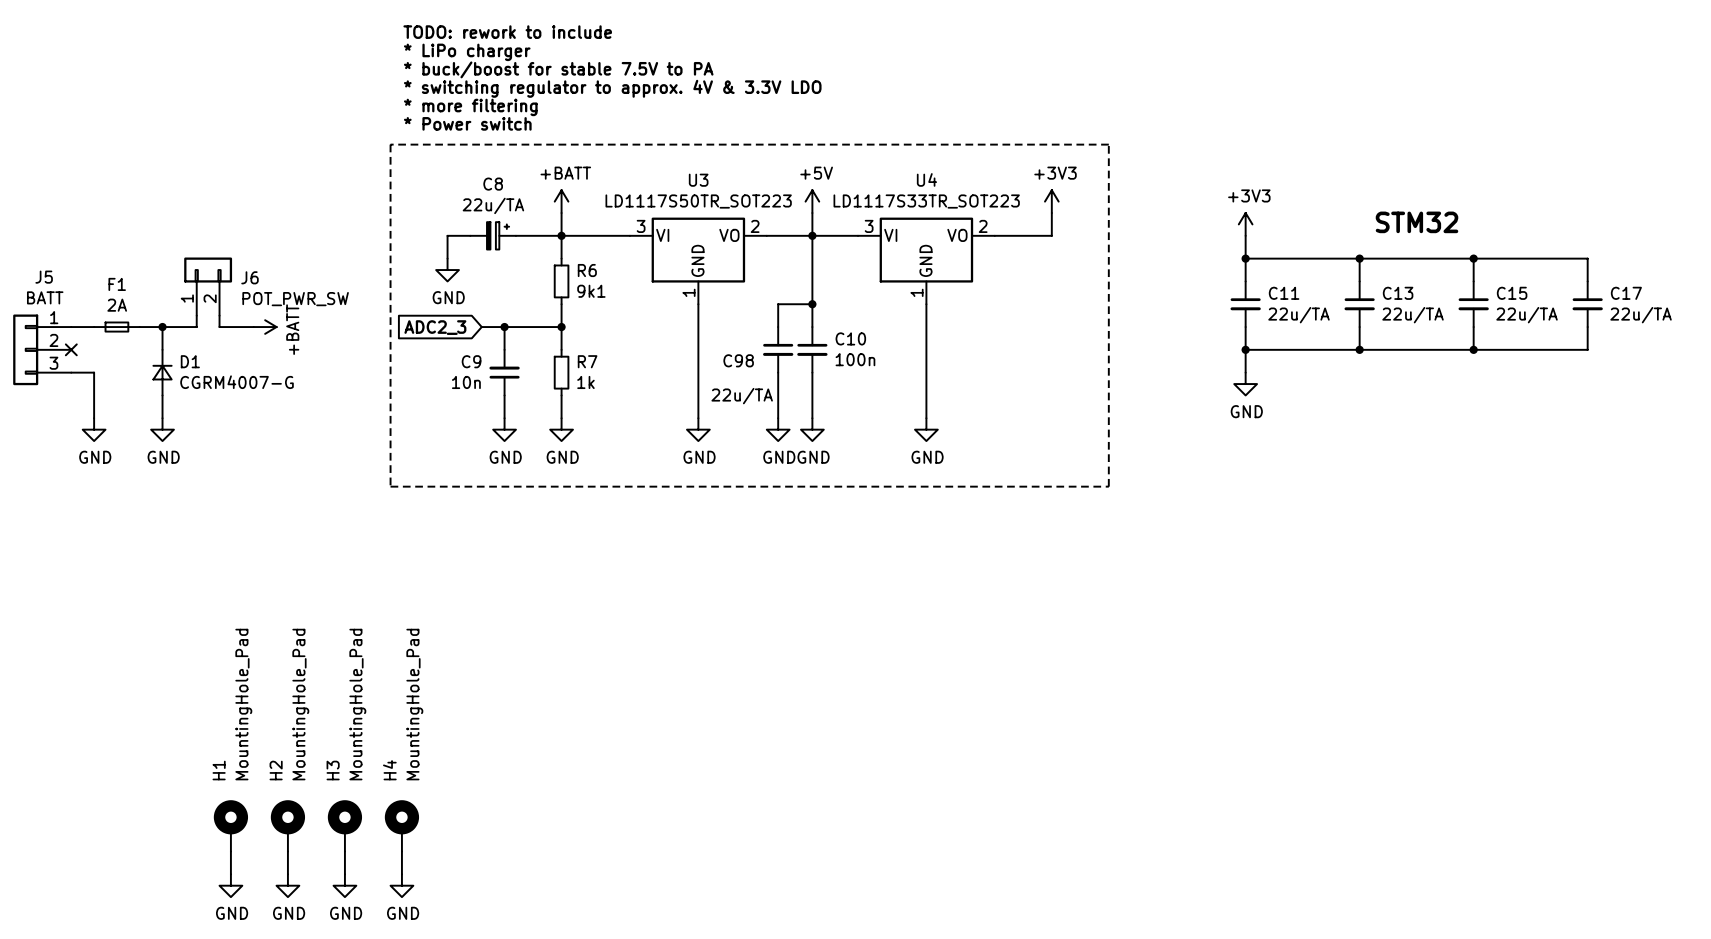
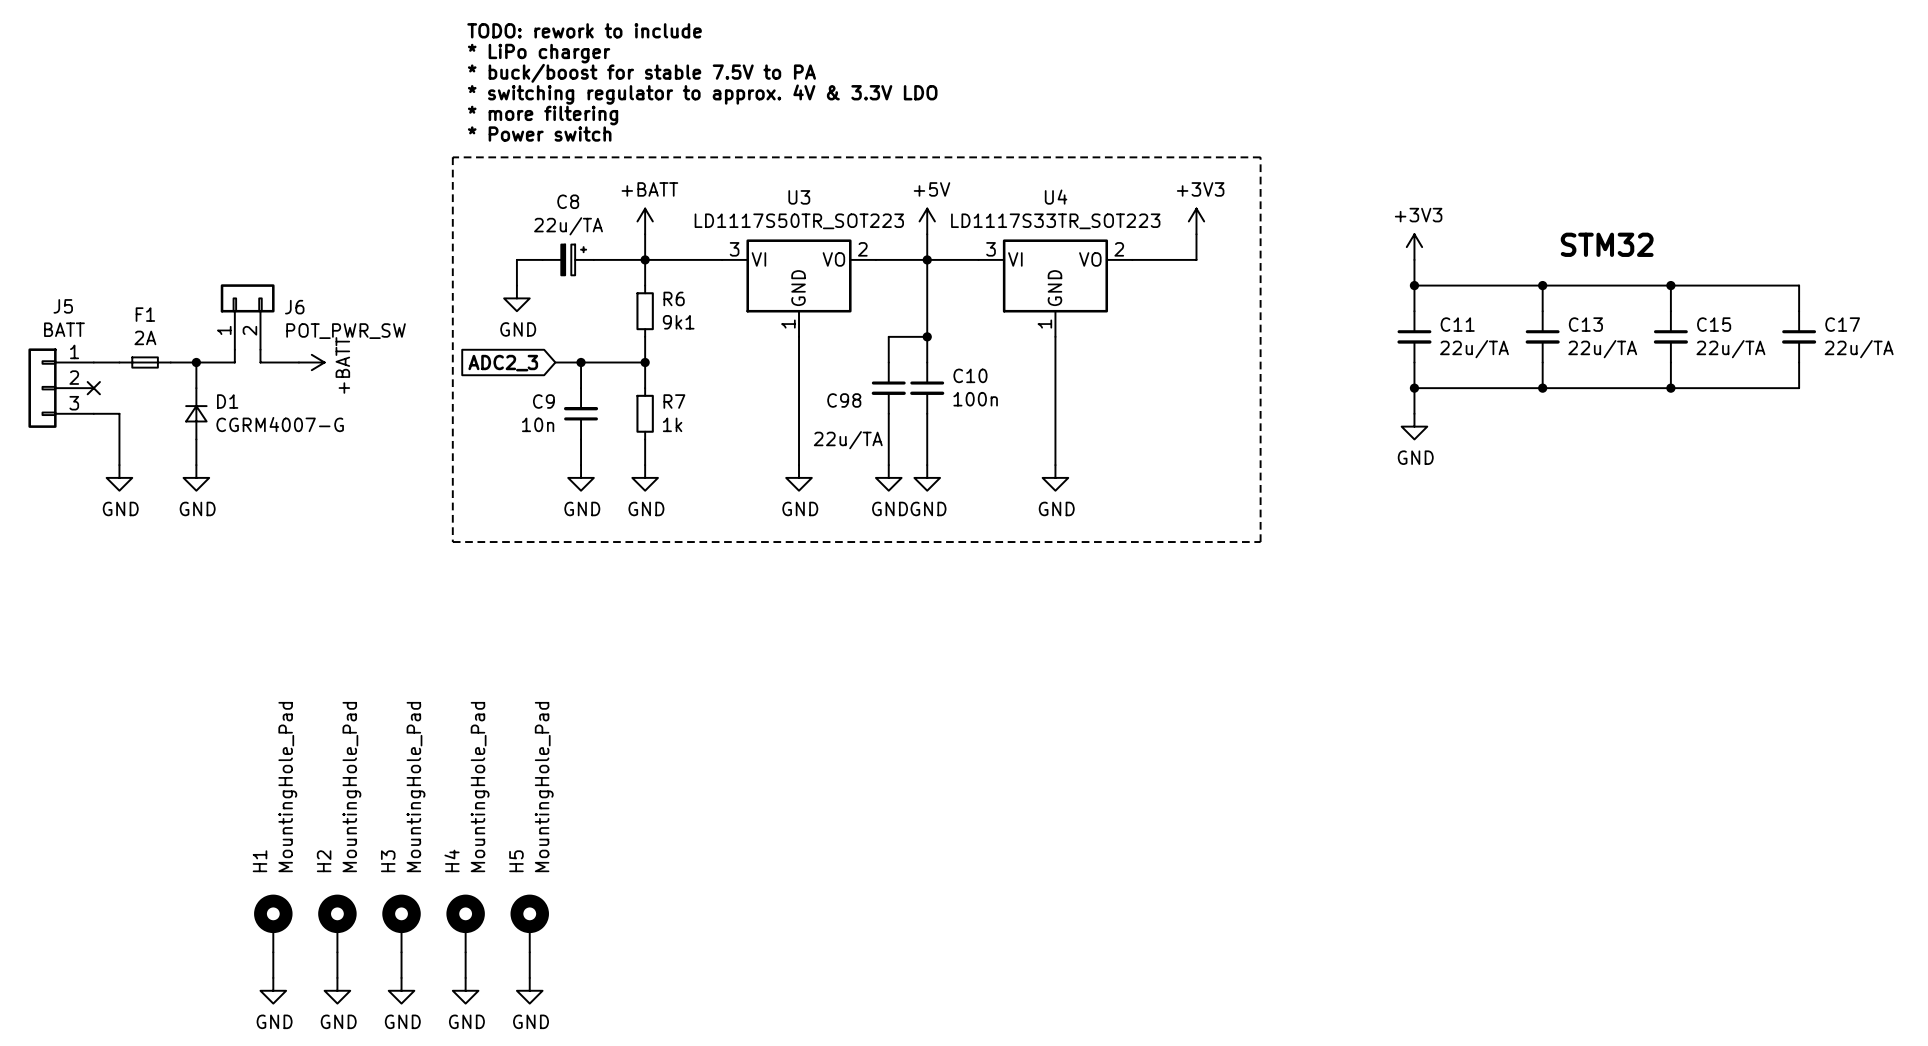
H5: none -> MountingHole_Pad (529, 923)
wire: none -> (529, 952) (529, 977)
power symbol: none -> GND (529, 990)

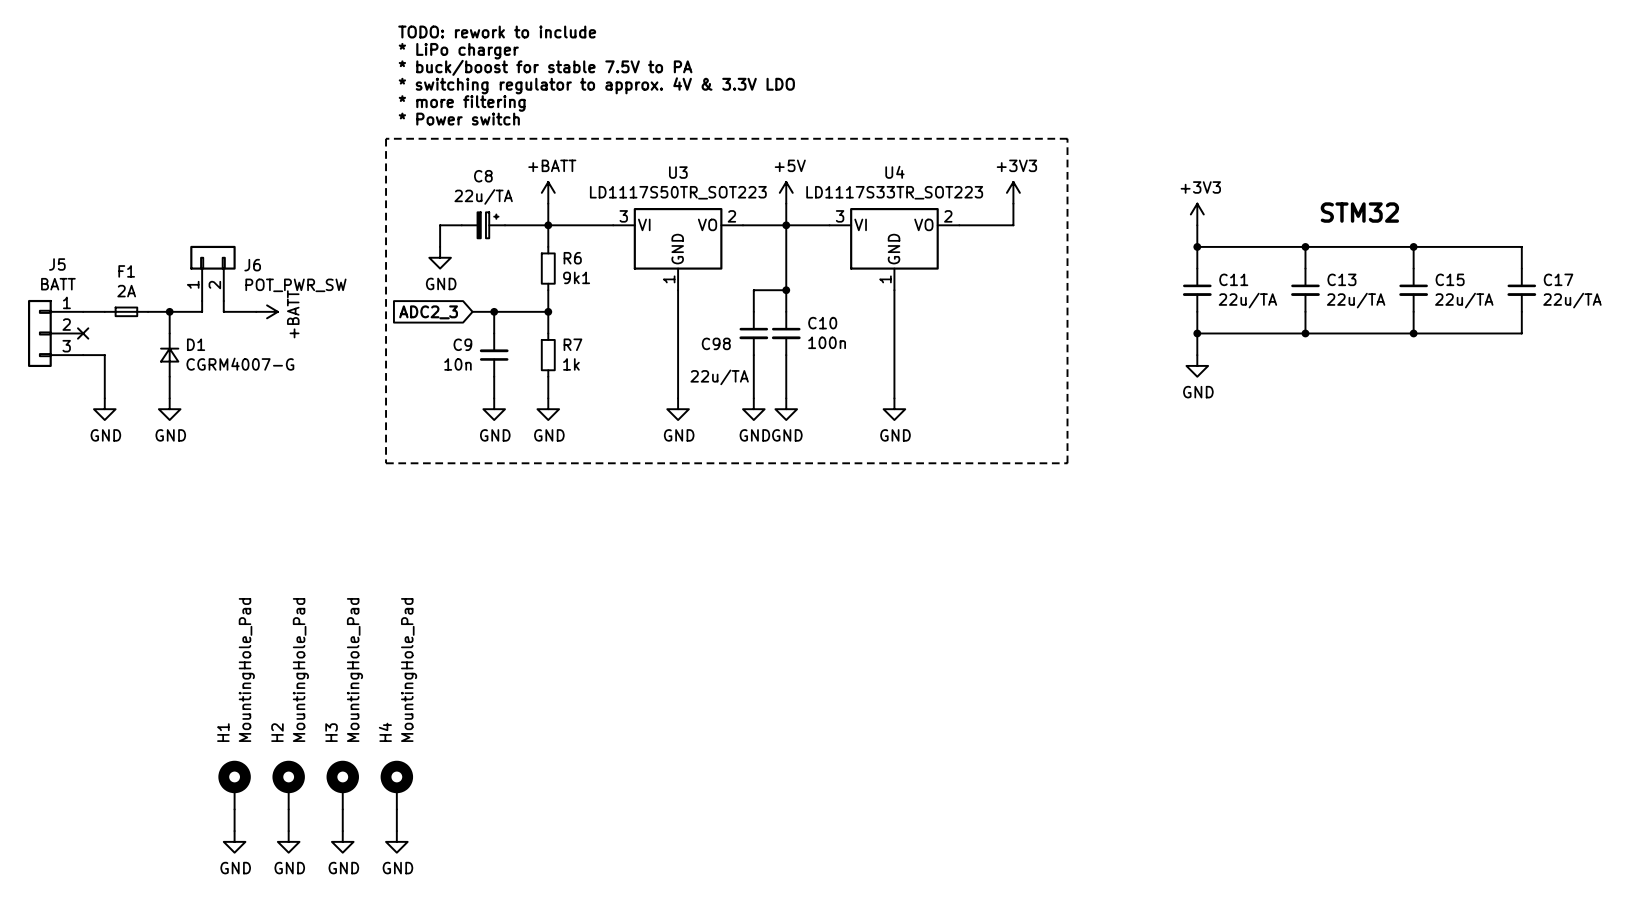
H5: MountingHole_Pad (529, 923) -> none
wire: (529, 952) (529, 977) -> none
power symbol: GND (529, 990) -> none

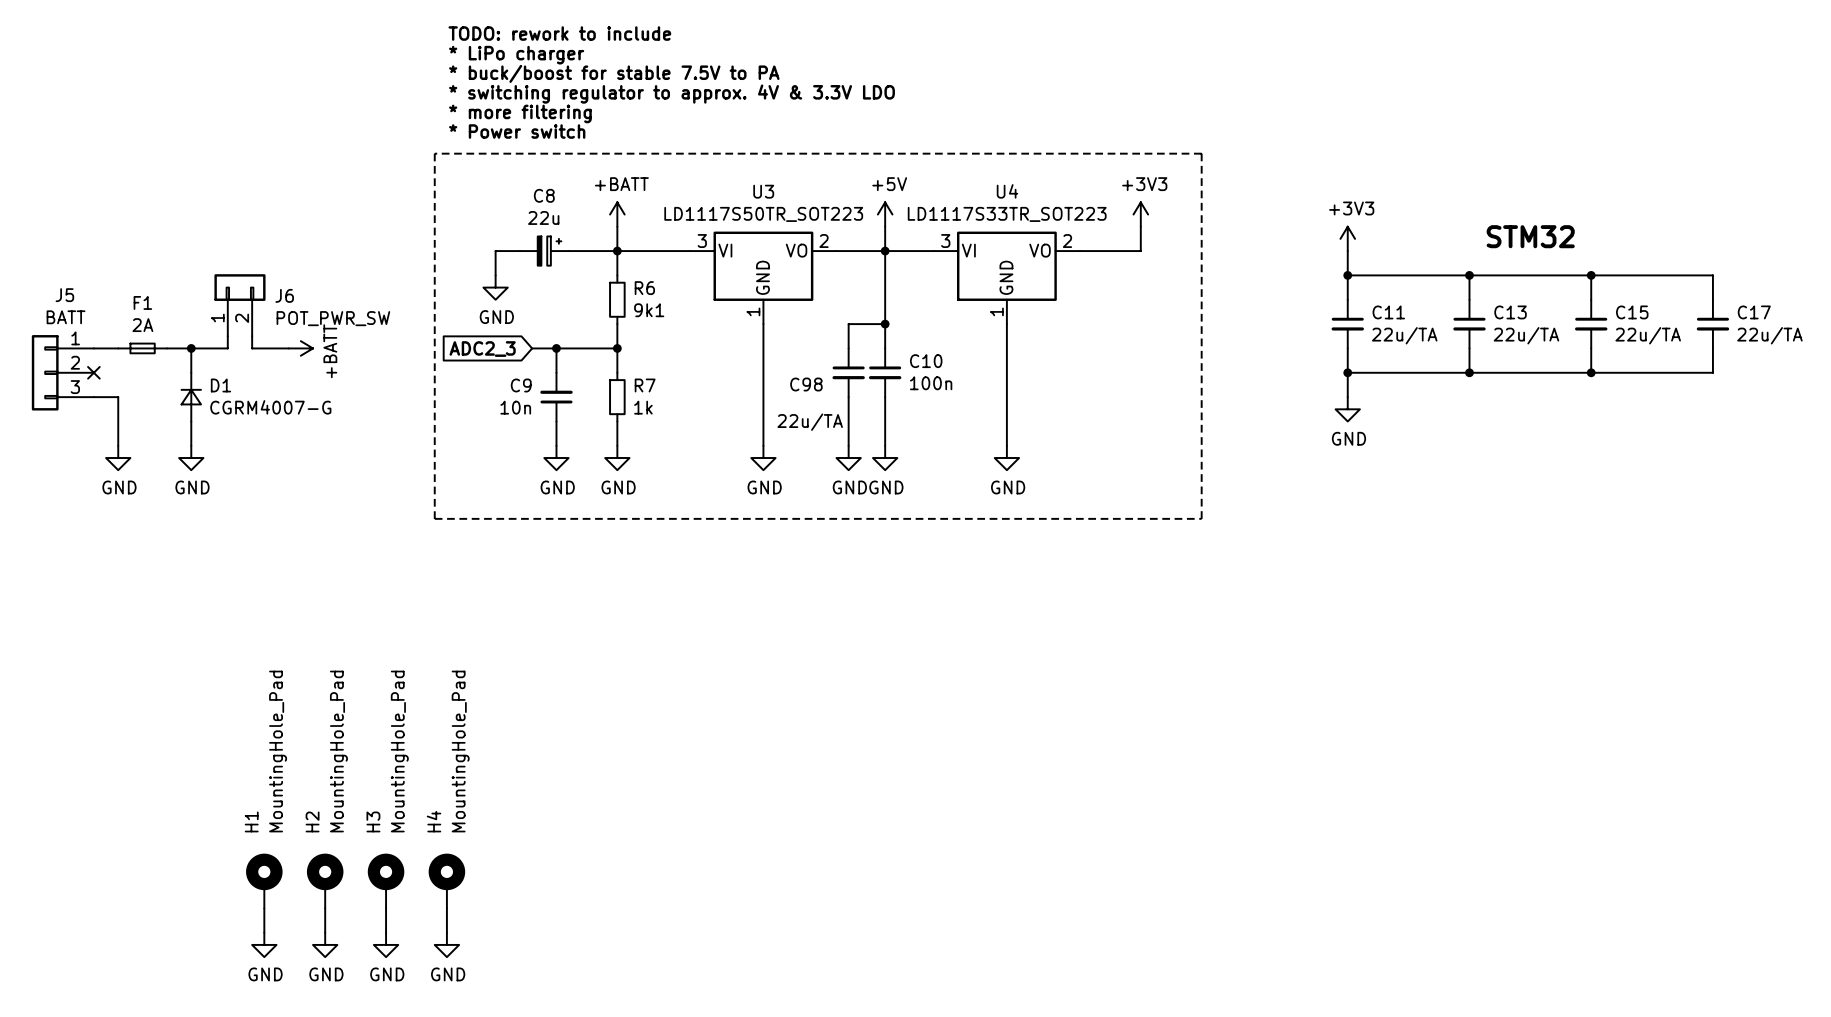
C8 value: 22u/TA (483, 196) -> 22u (543, 217)

